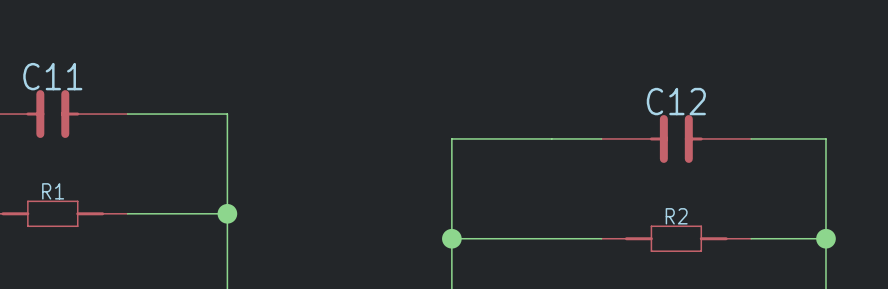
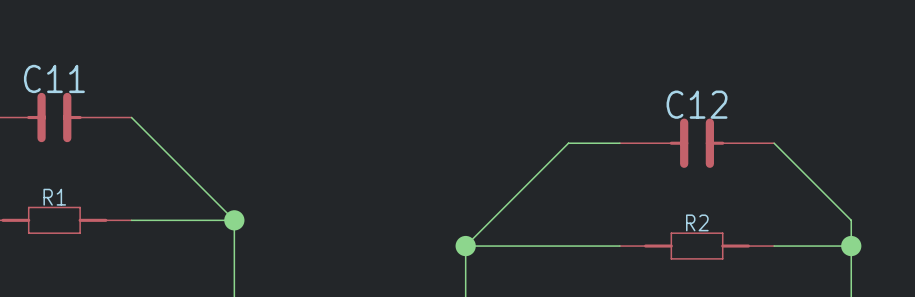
wire: (127, 114) (227, 114) (227, 213) -> (131, 117) (234, 220)
wire: (551, 138) (451, 138) (451, 238) -> (568, 143) (465, 246)
wire: (751, 138) (825, 138) (825, 213) -> (774, 143) (851, 220)

